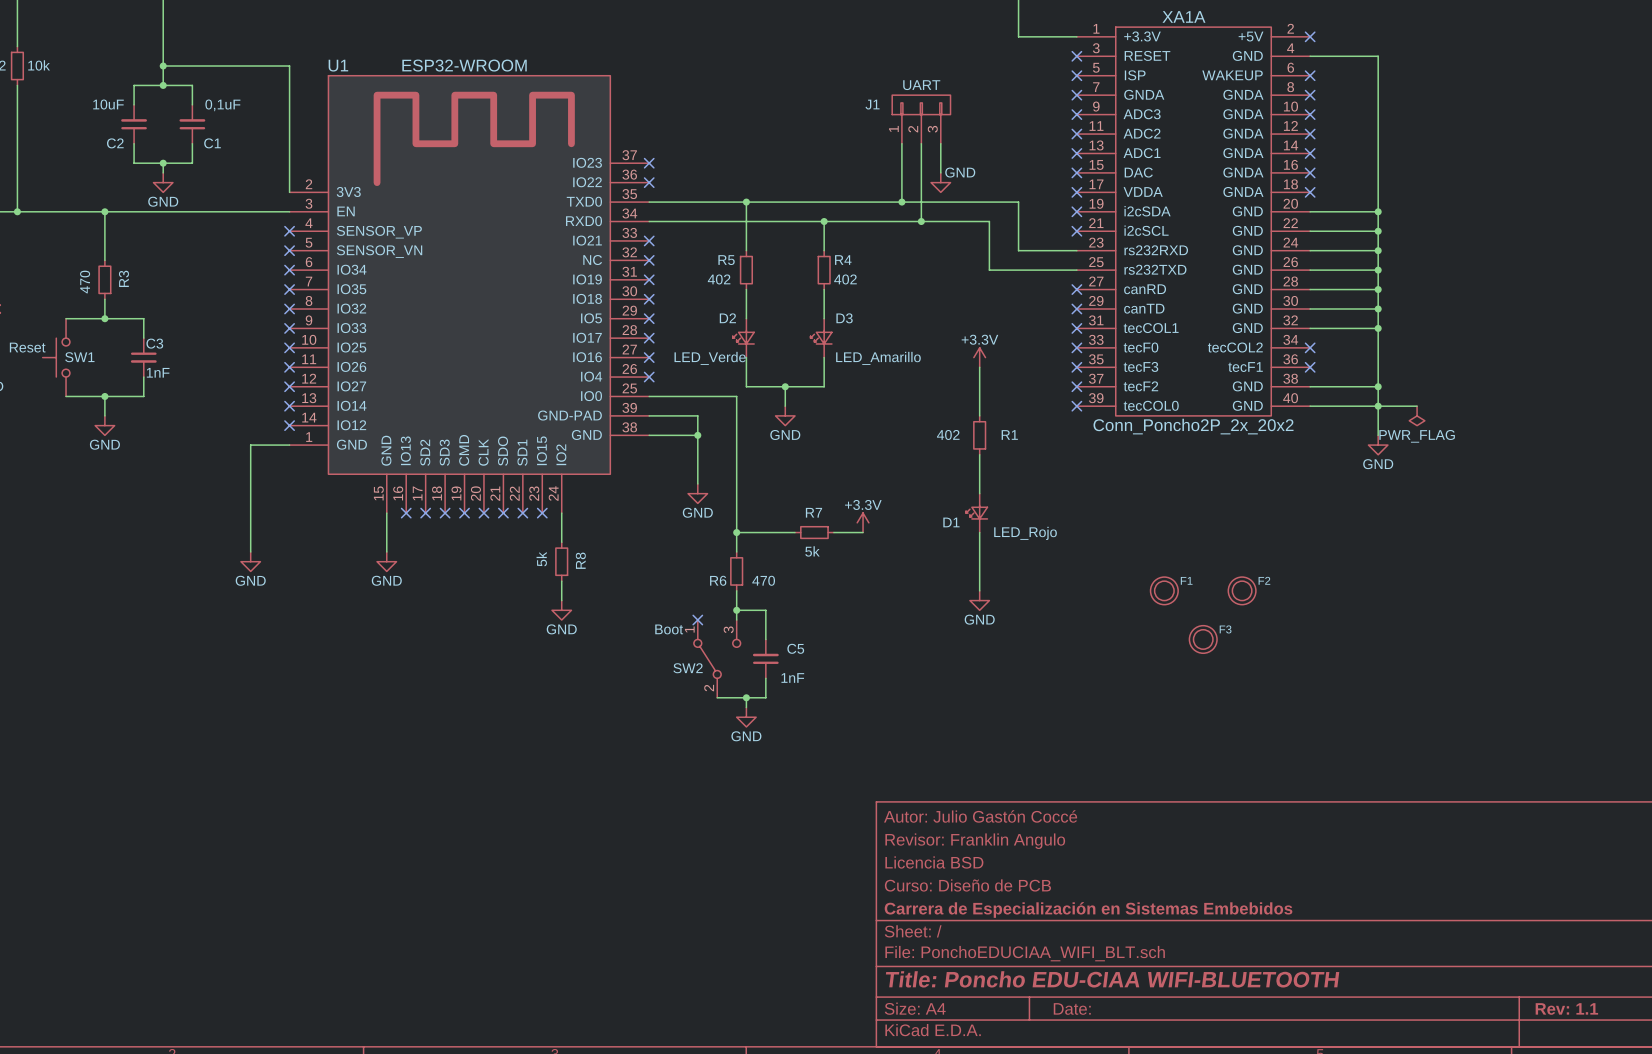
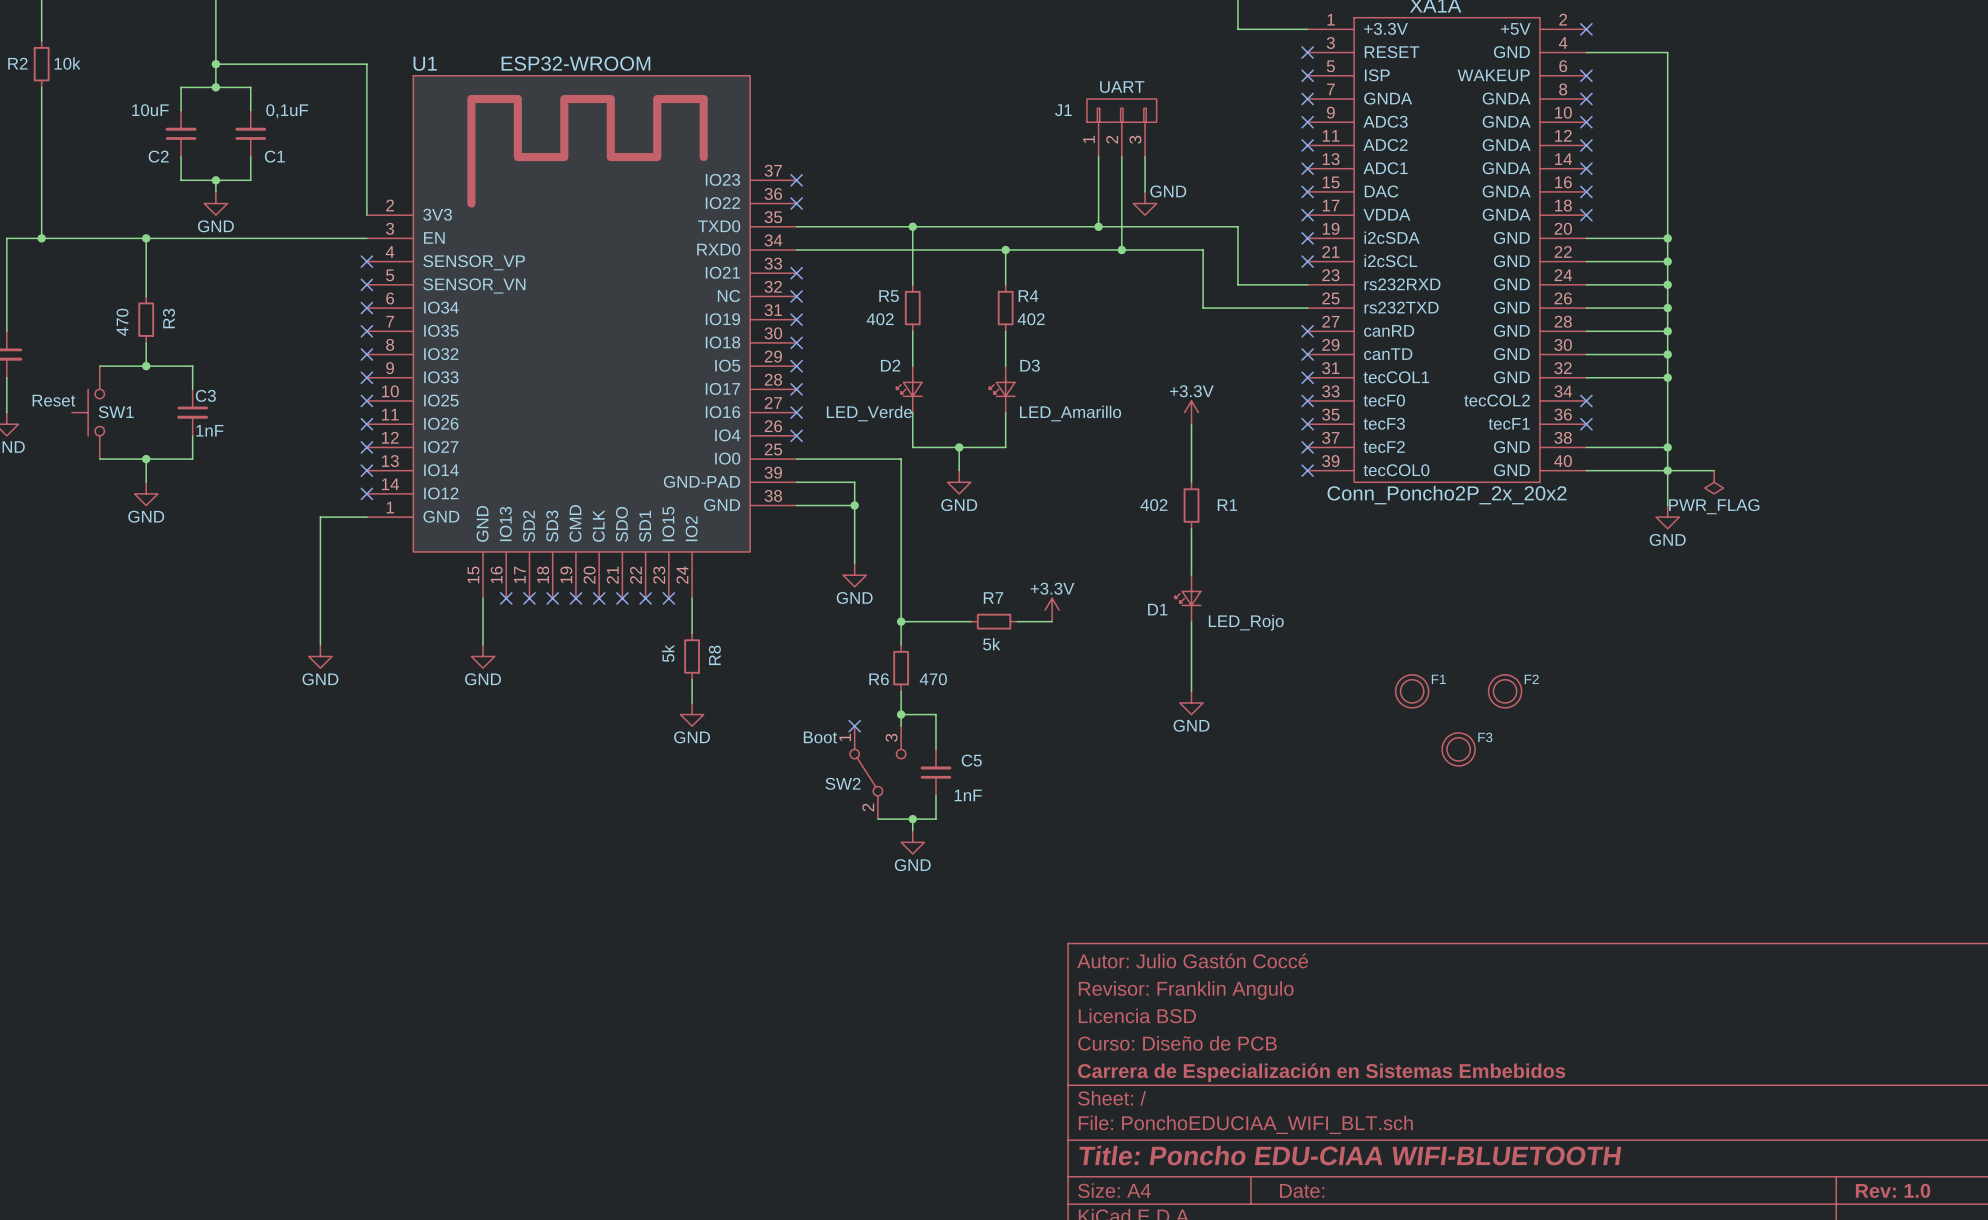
title block: Rev: 1.1 (1566, 1008) -> Rev: 1.0 (1893, 1190)

